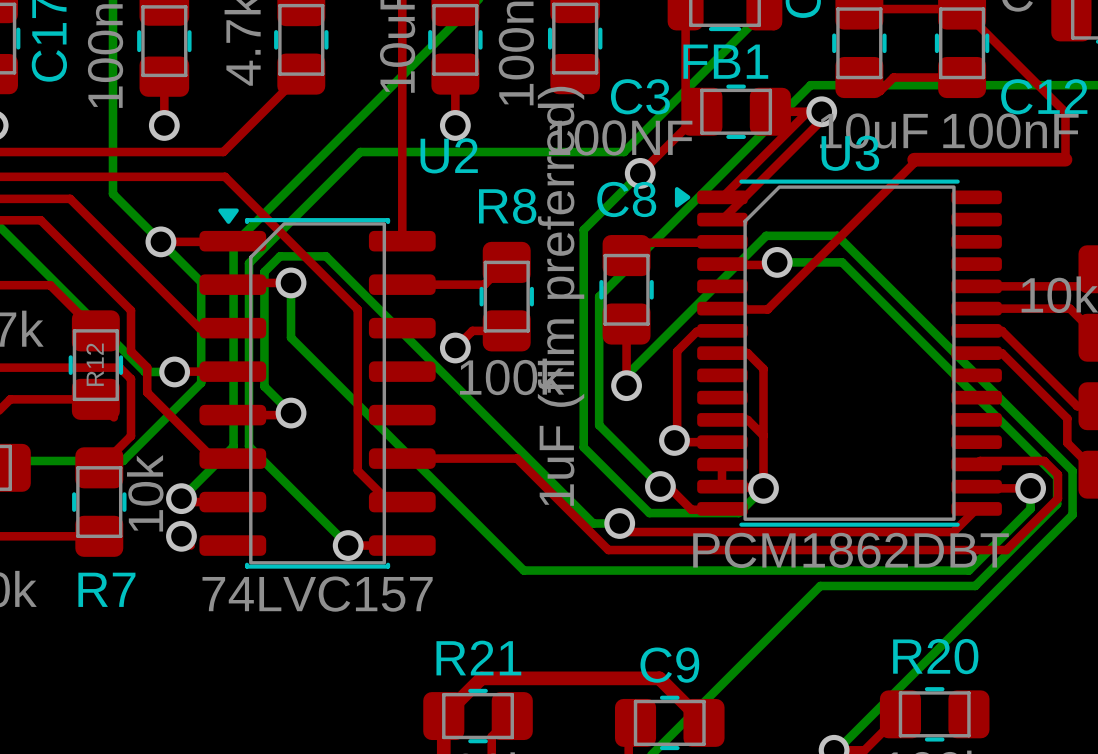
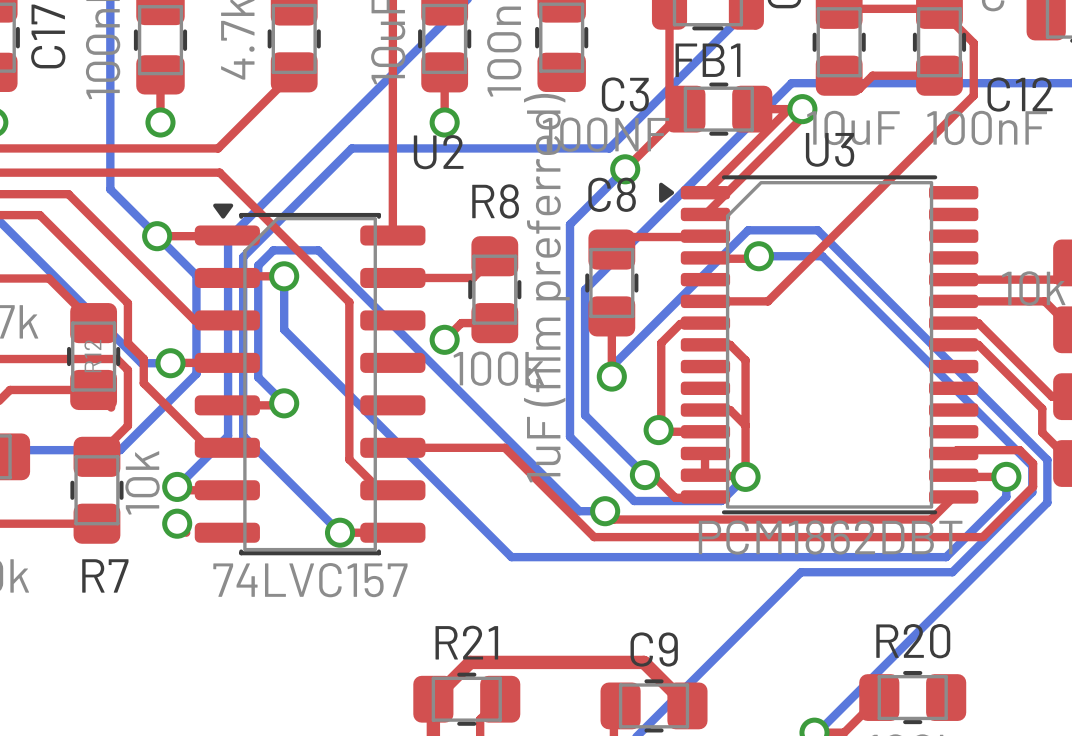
top track: (997, 44) (1065, 112) (1065, 159) (914, 159) (914, 163) (767, 309) (721, 309) -> (973, 43) (973, 95) (768, 301) (705, 301)

